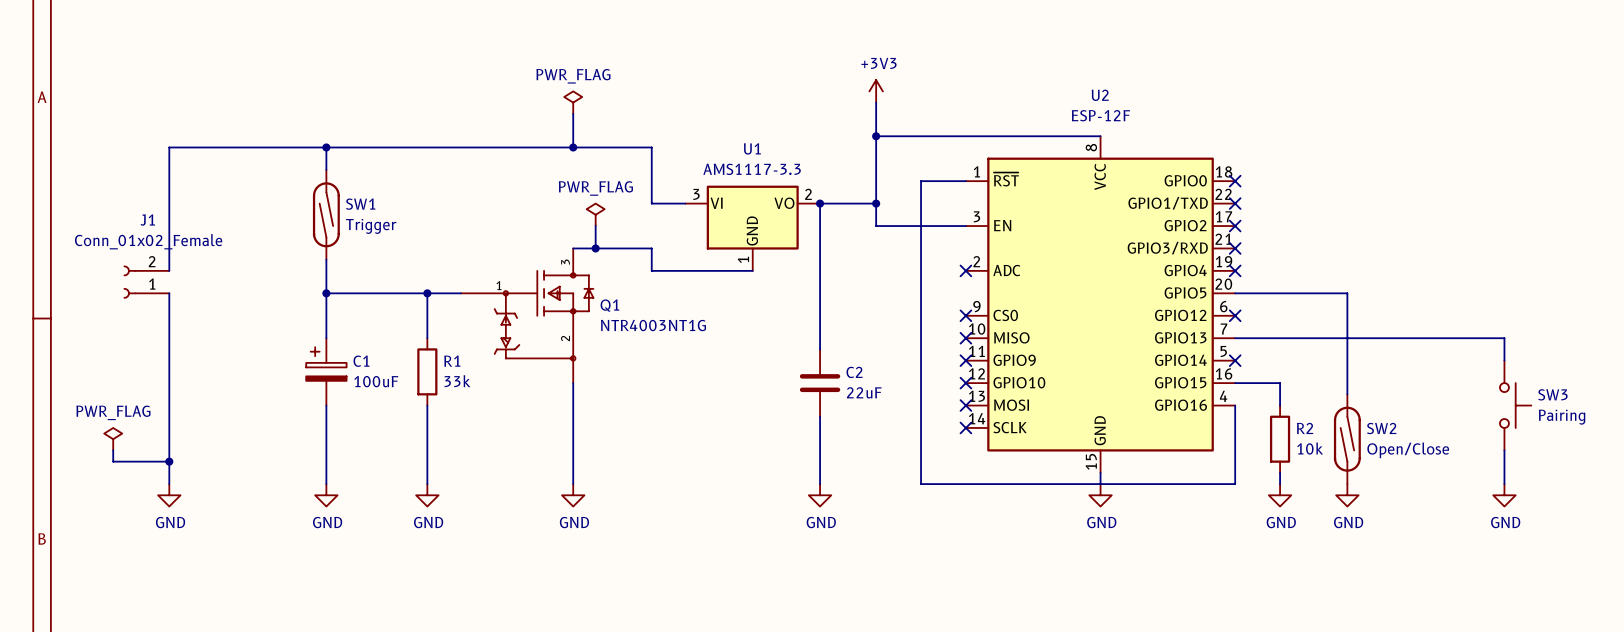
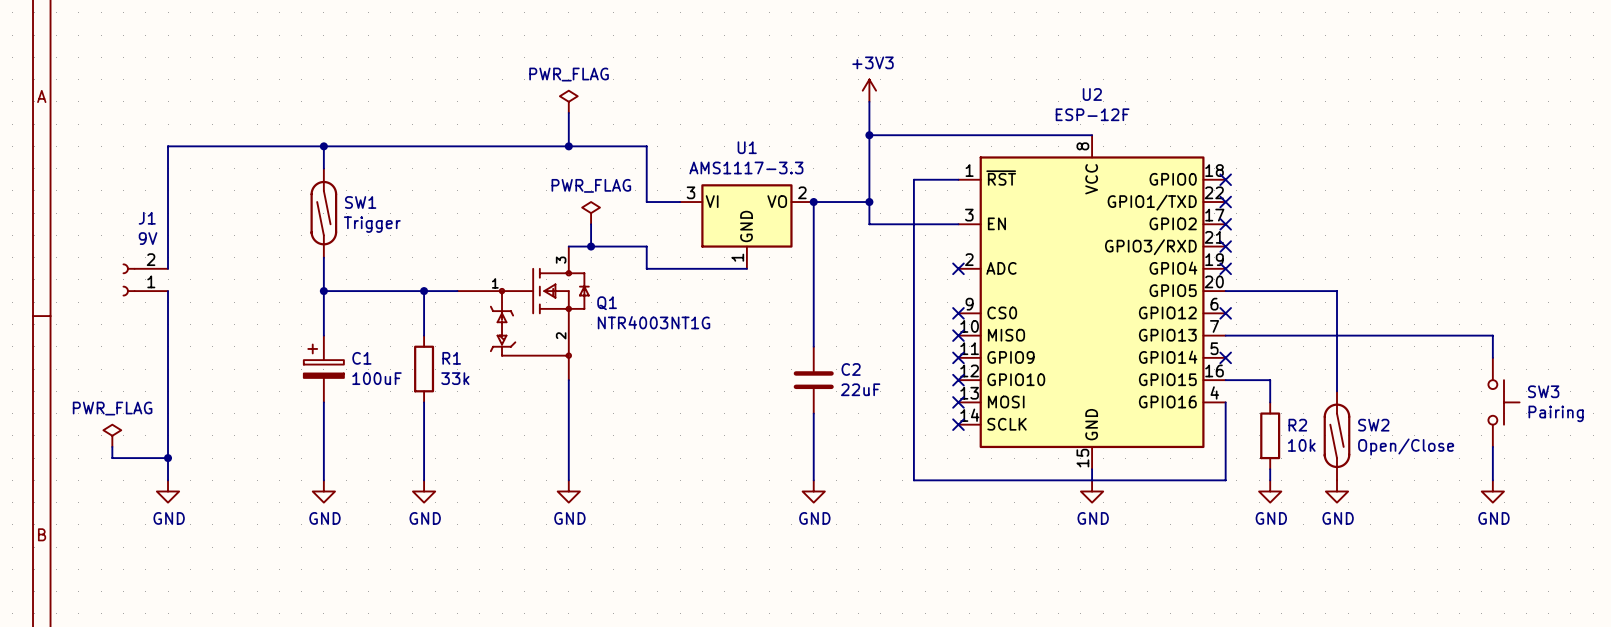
J1 value: Conn_01x02_Female (148, 241) -> 9V (148, 238)

